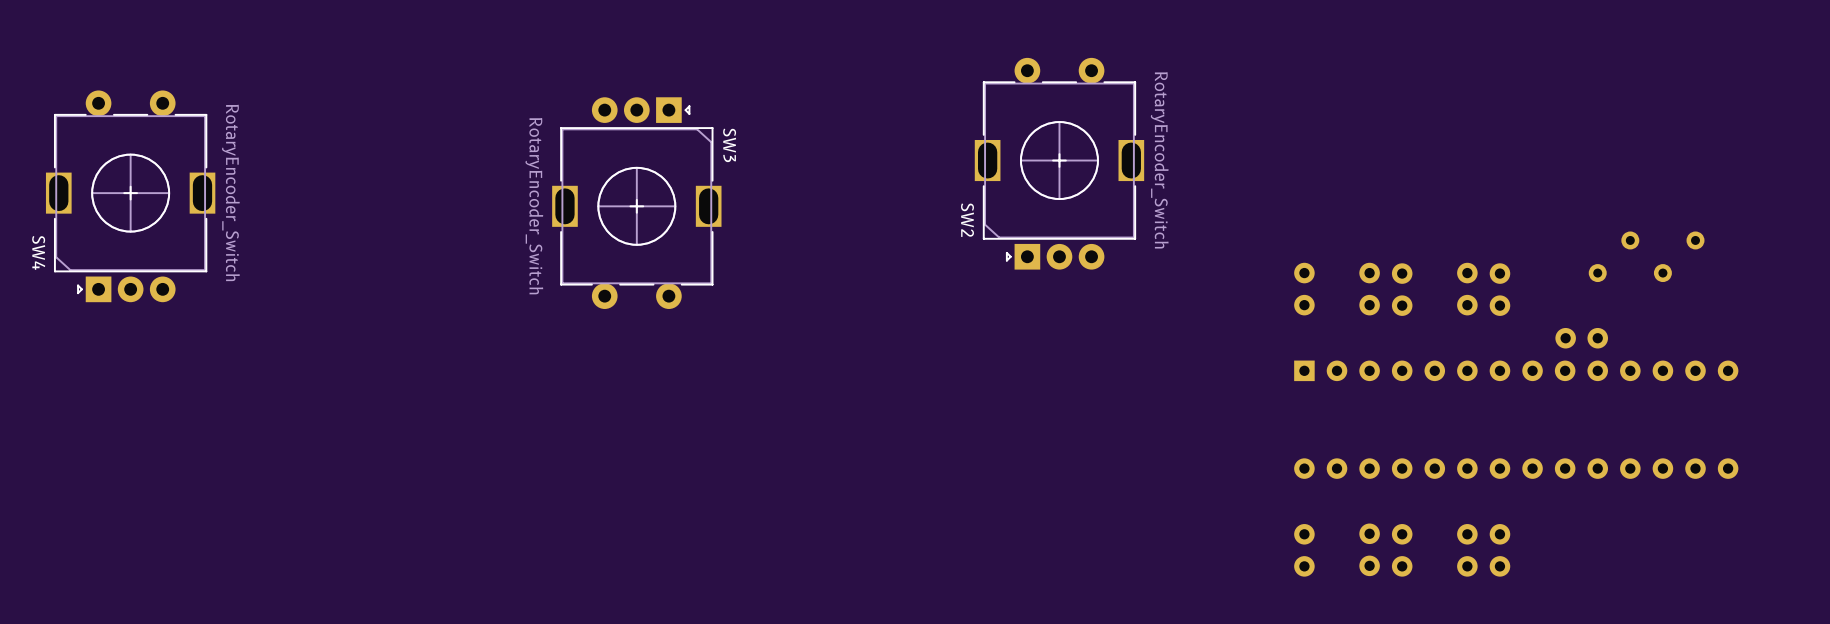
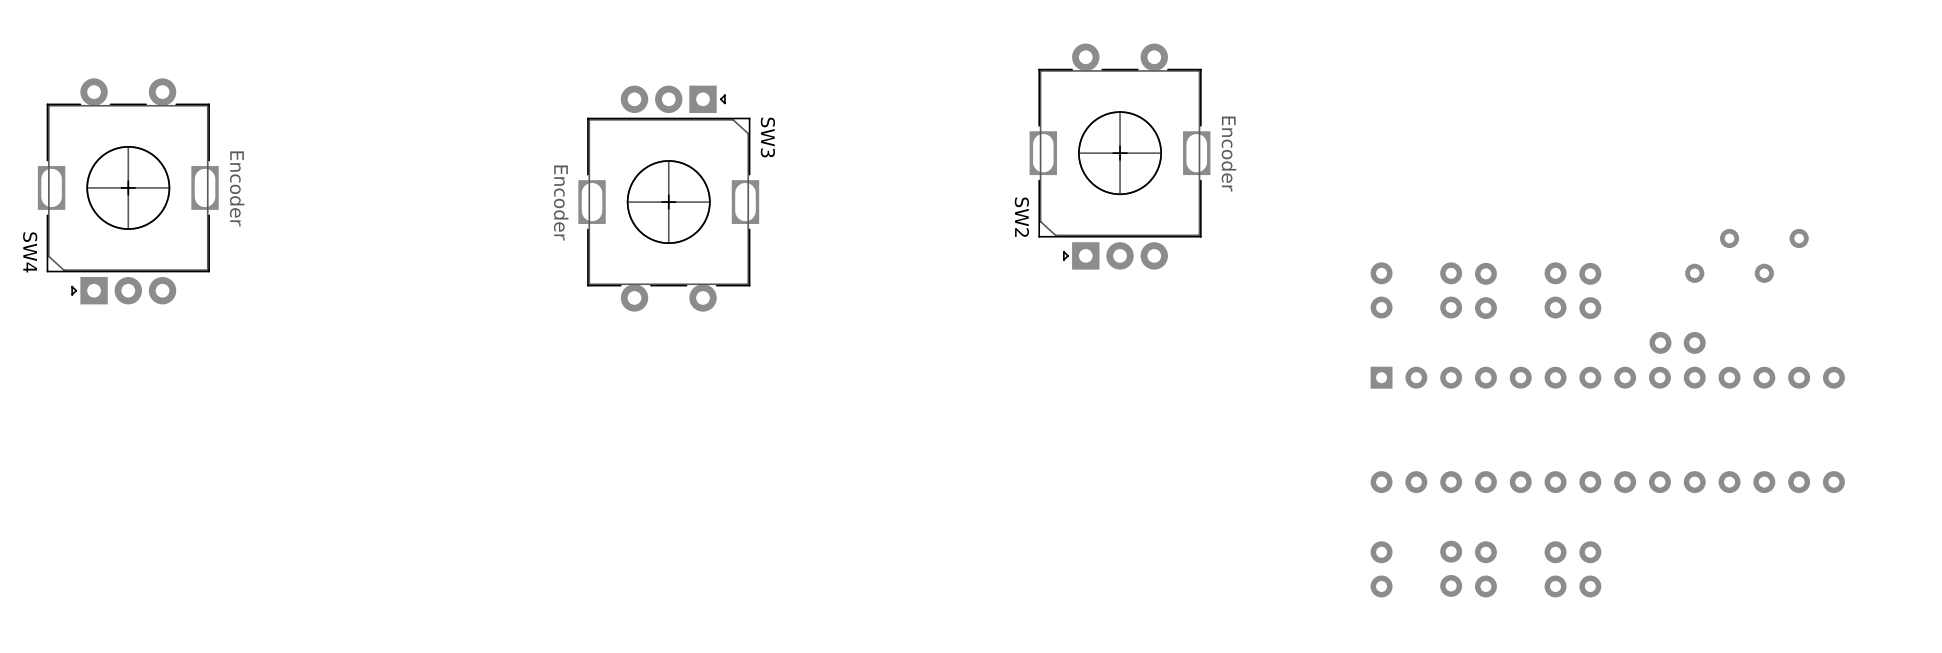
SW2 value: RotaryEncoder_Switch (1159, 160) -> Encoder (1228, 154)
SW4 value: RotaryEncoder_Switch (230, 192) -> Encoder (237, 188)
SW3 value: RotaryEncoder_Switch (534, 206) -> Encoder (561, 202)

